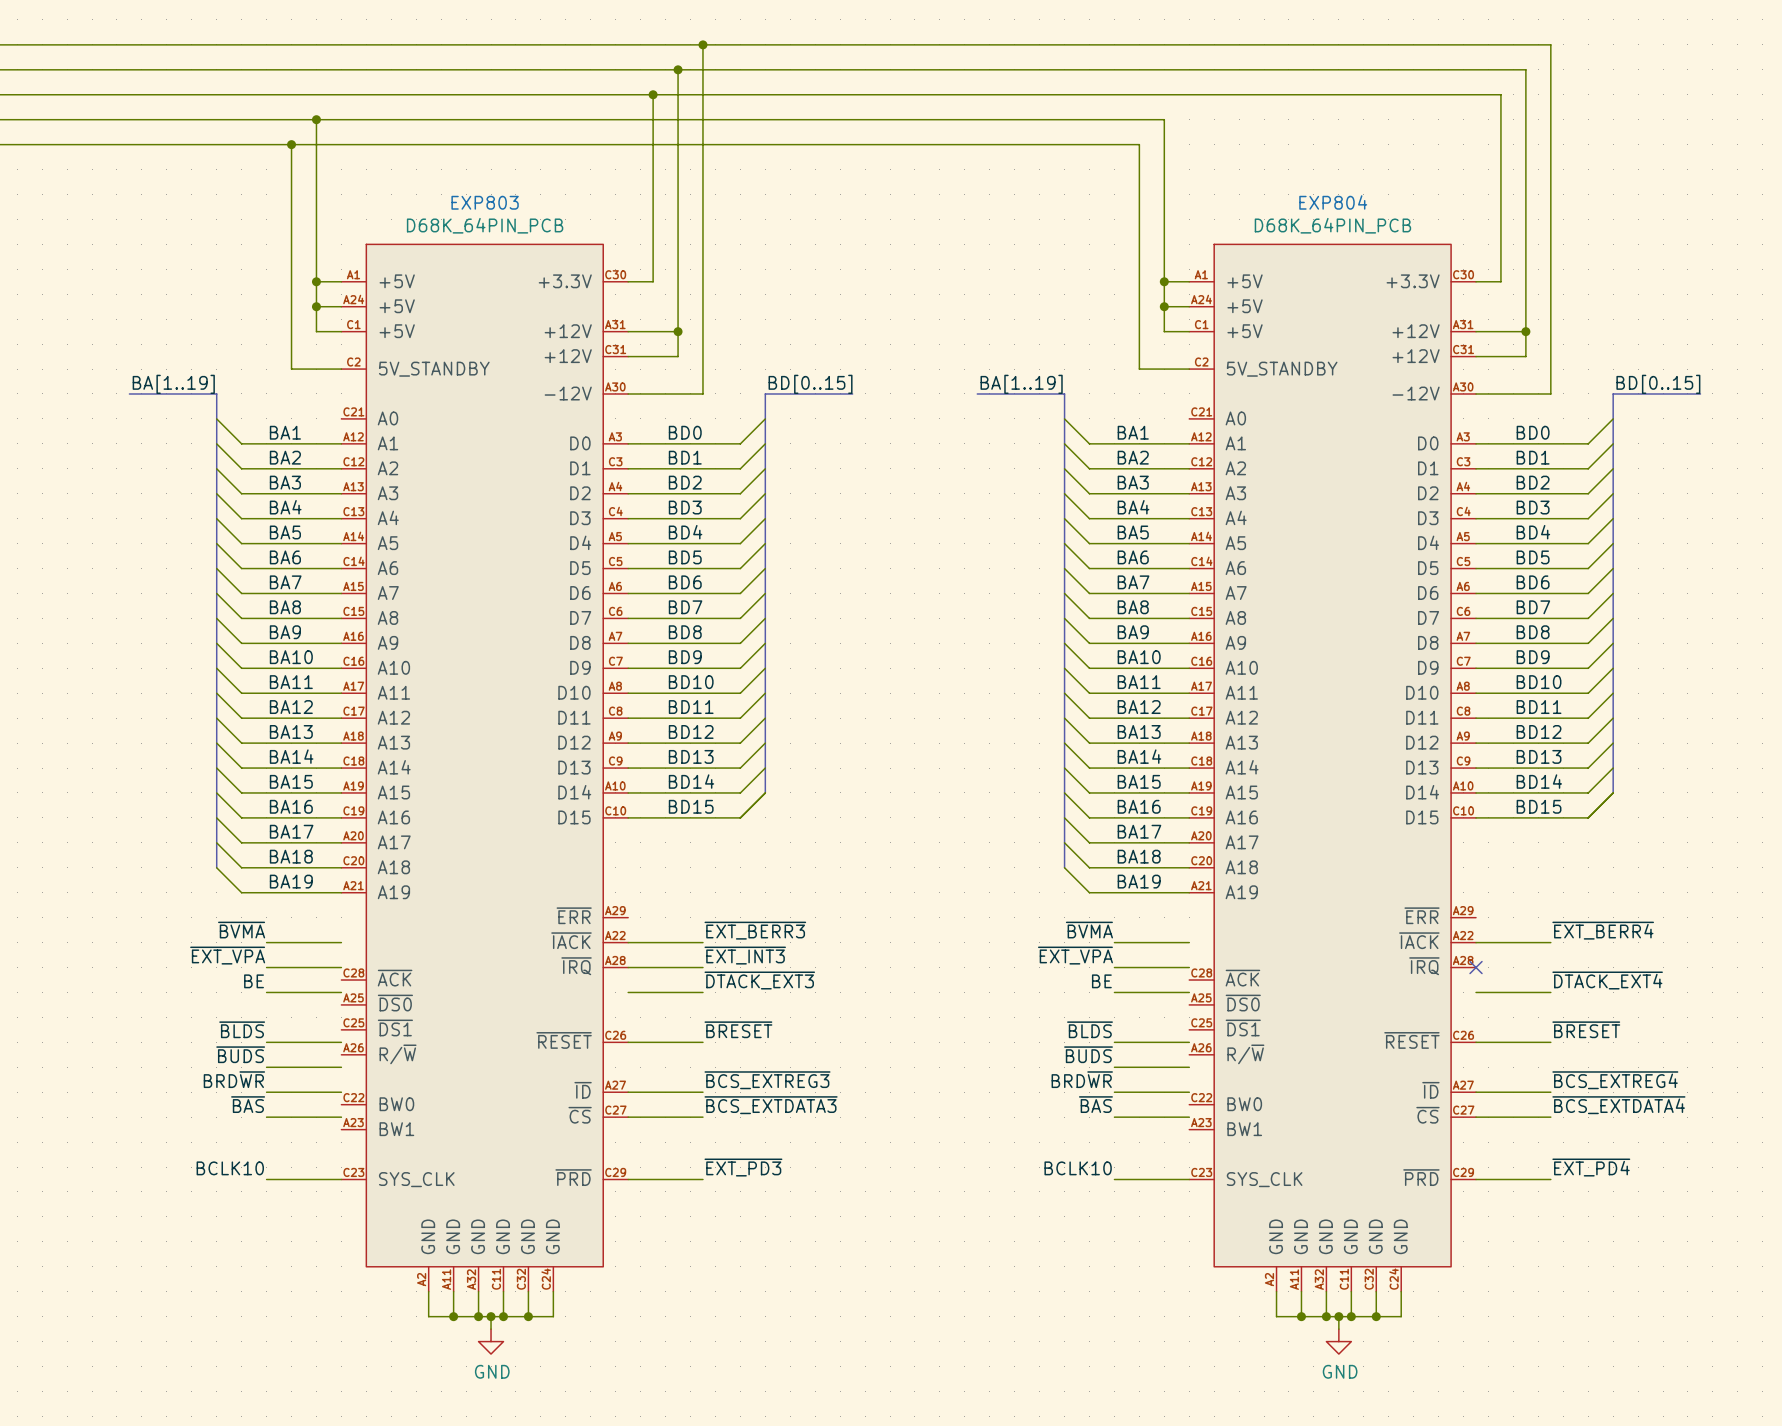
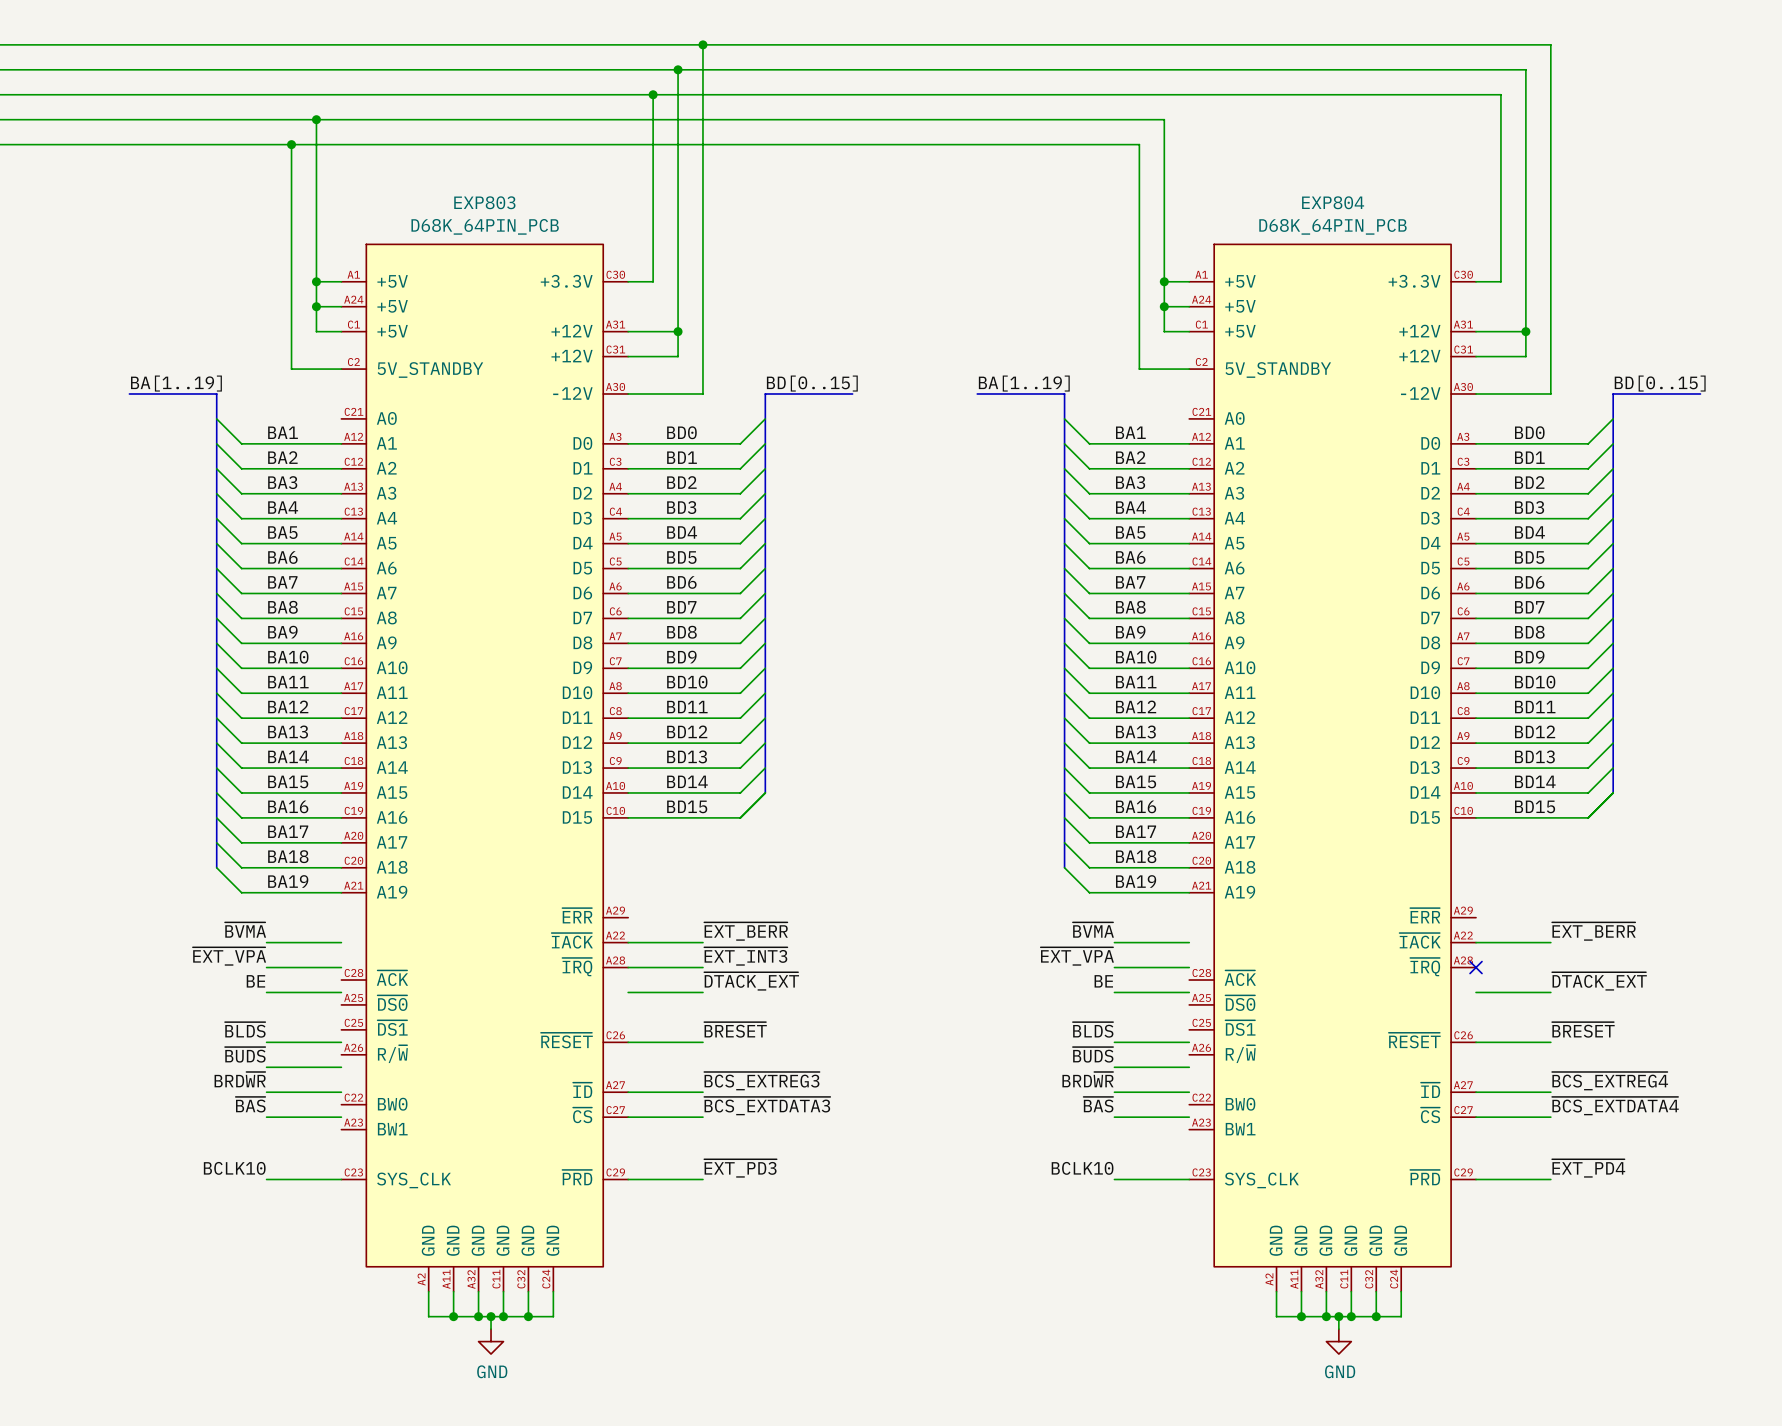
label: ~{EXT_BERR3} (755, 930) -> ~{EXT_BERR} (746, 931)
label: ~{EXT_BERR4} (1603, 930) -> ~{EXT_BERR} (1593, 931)
label: ~{DTACK_EXT3} (759, 980) -> ~{DTACK_EXT} (751, 981)
label: ~{DTACK_EXT4} (1607, 980) -> ~{DTACK_EXT} (1599, 981)

